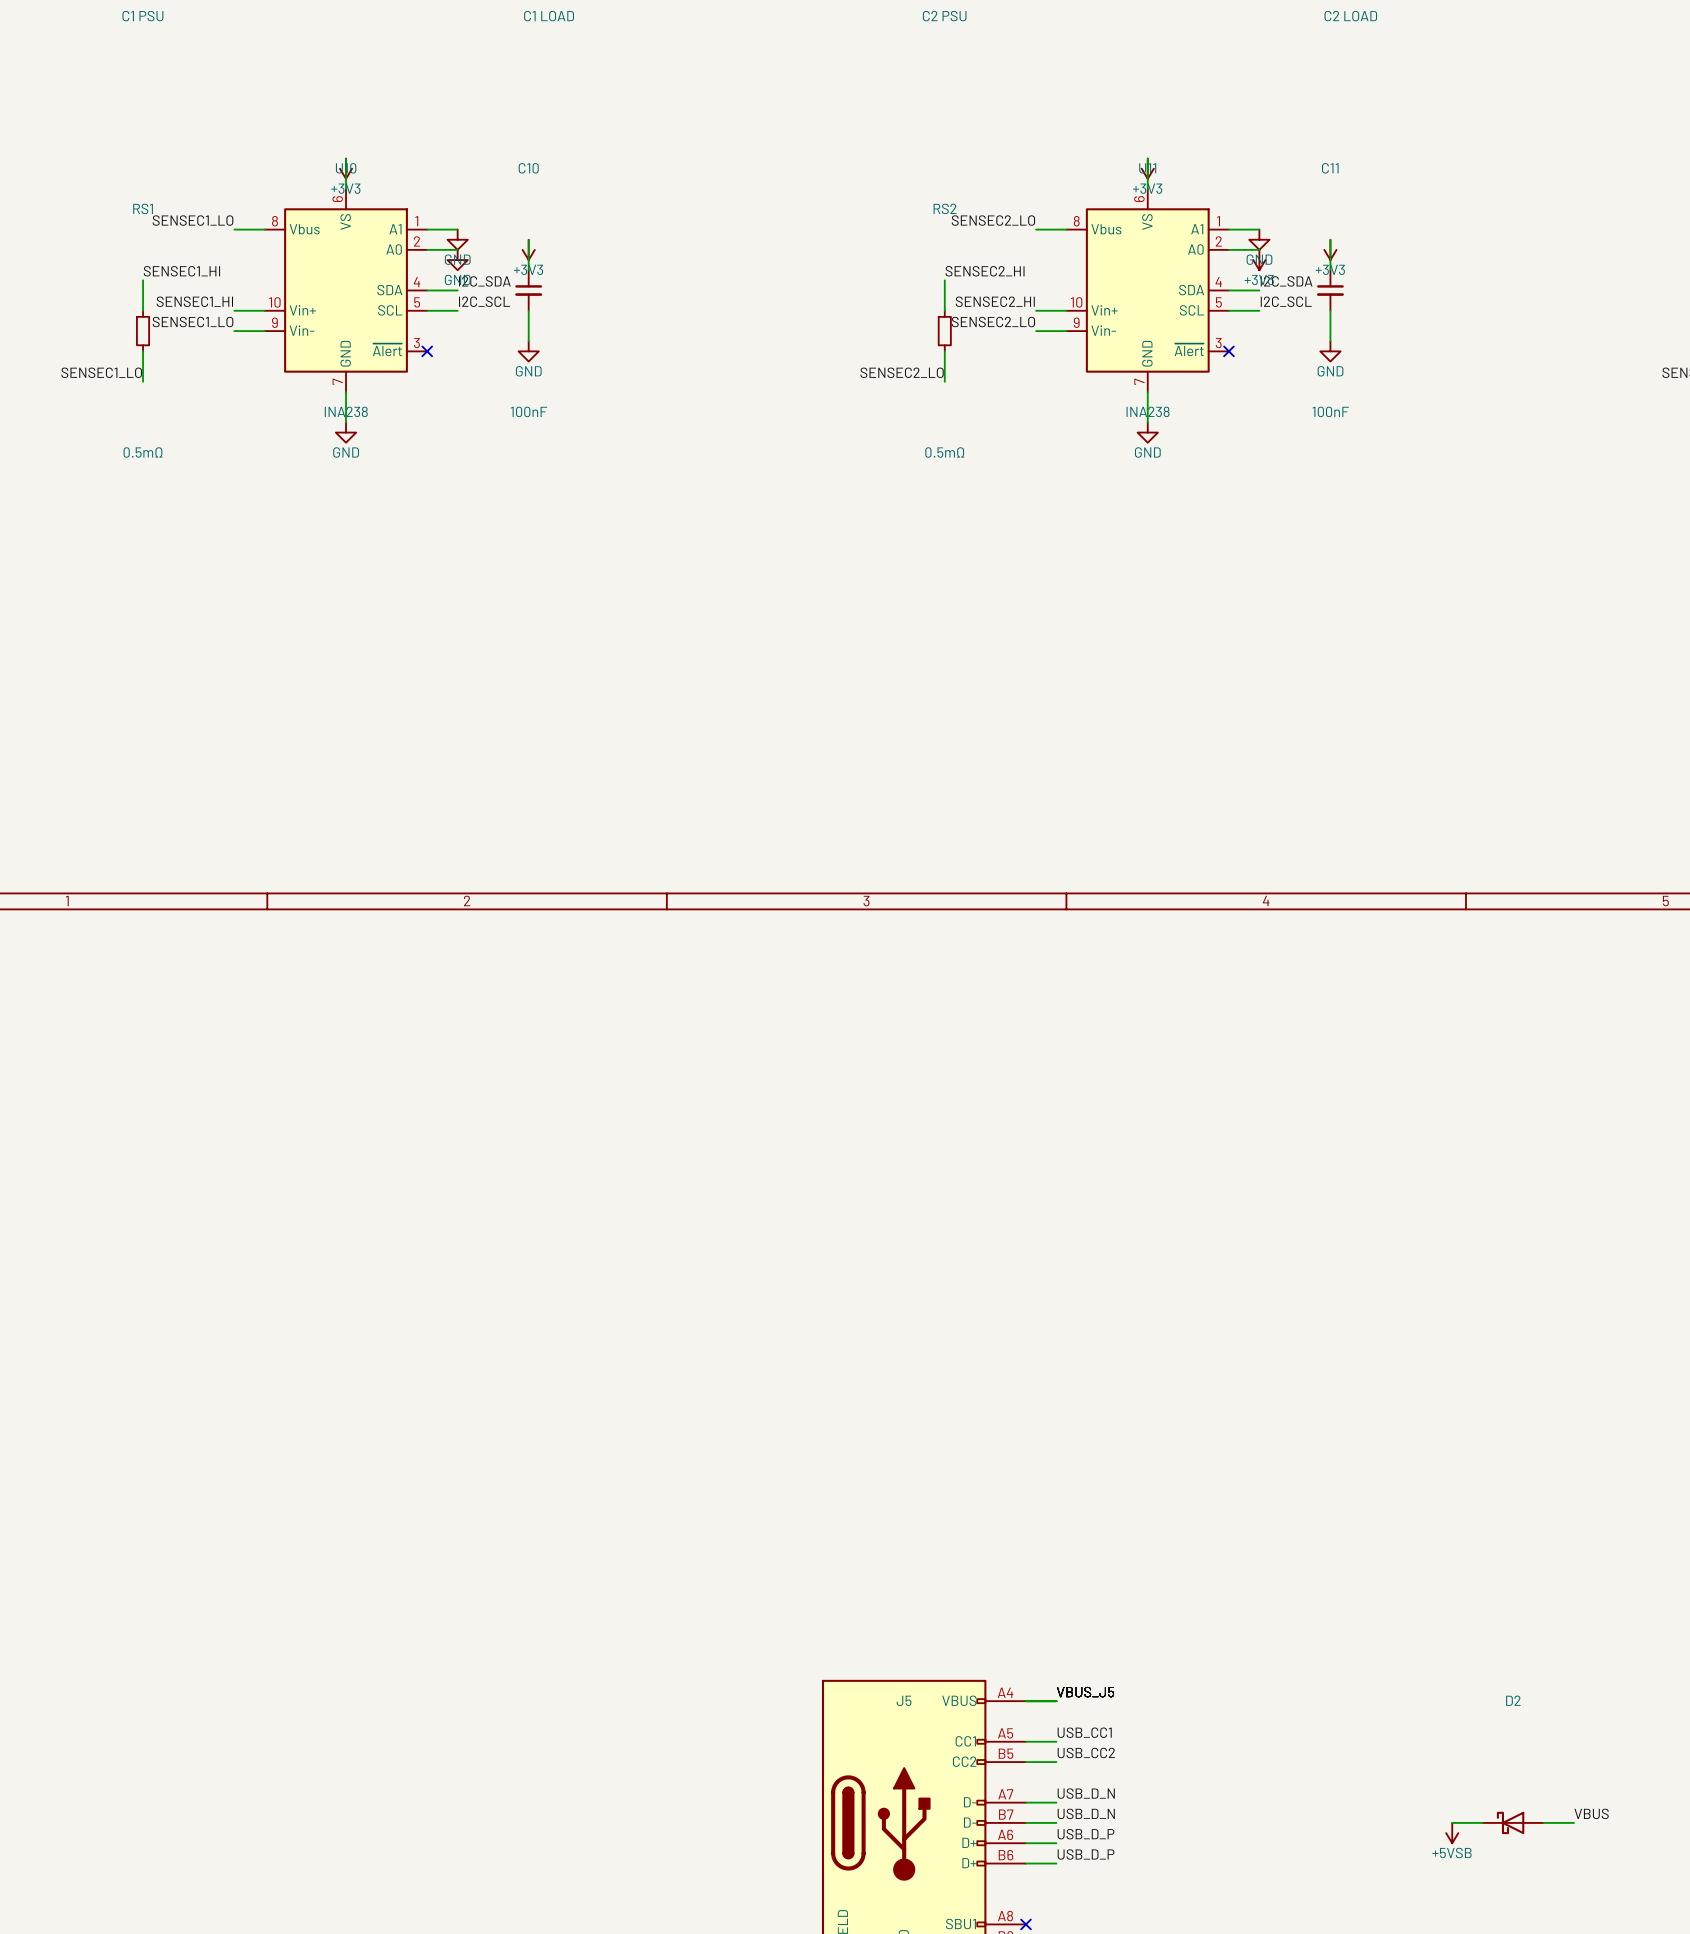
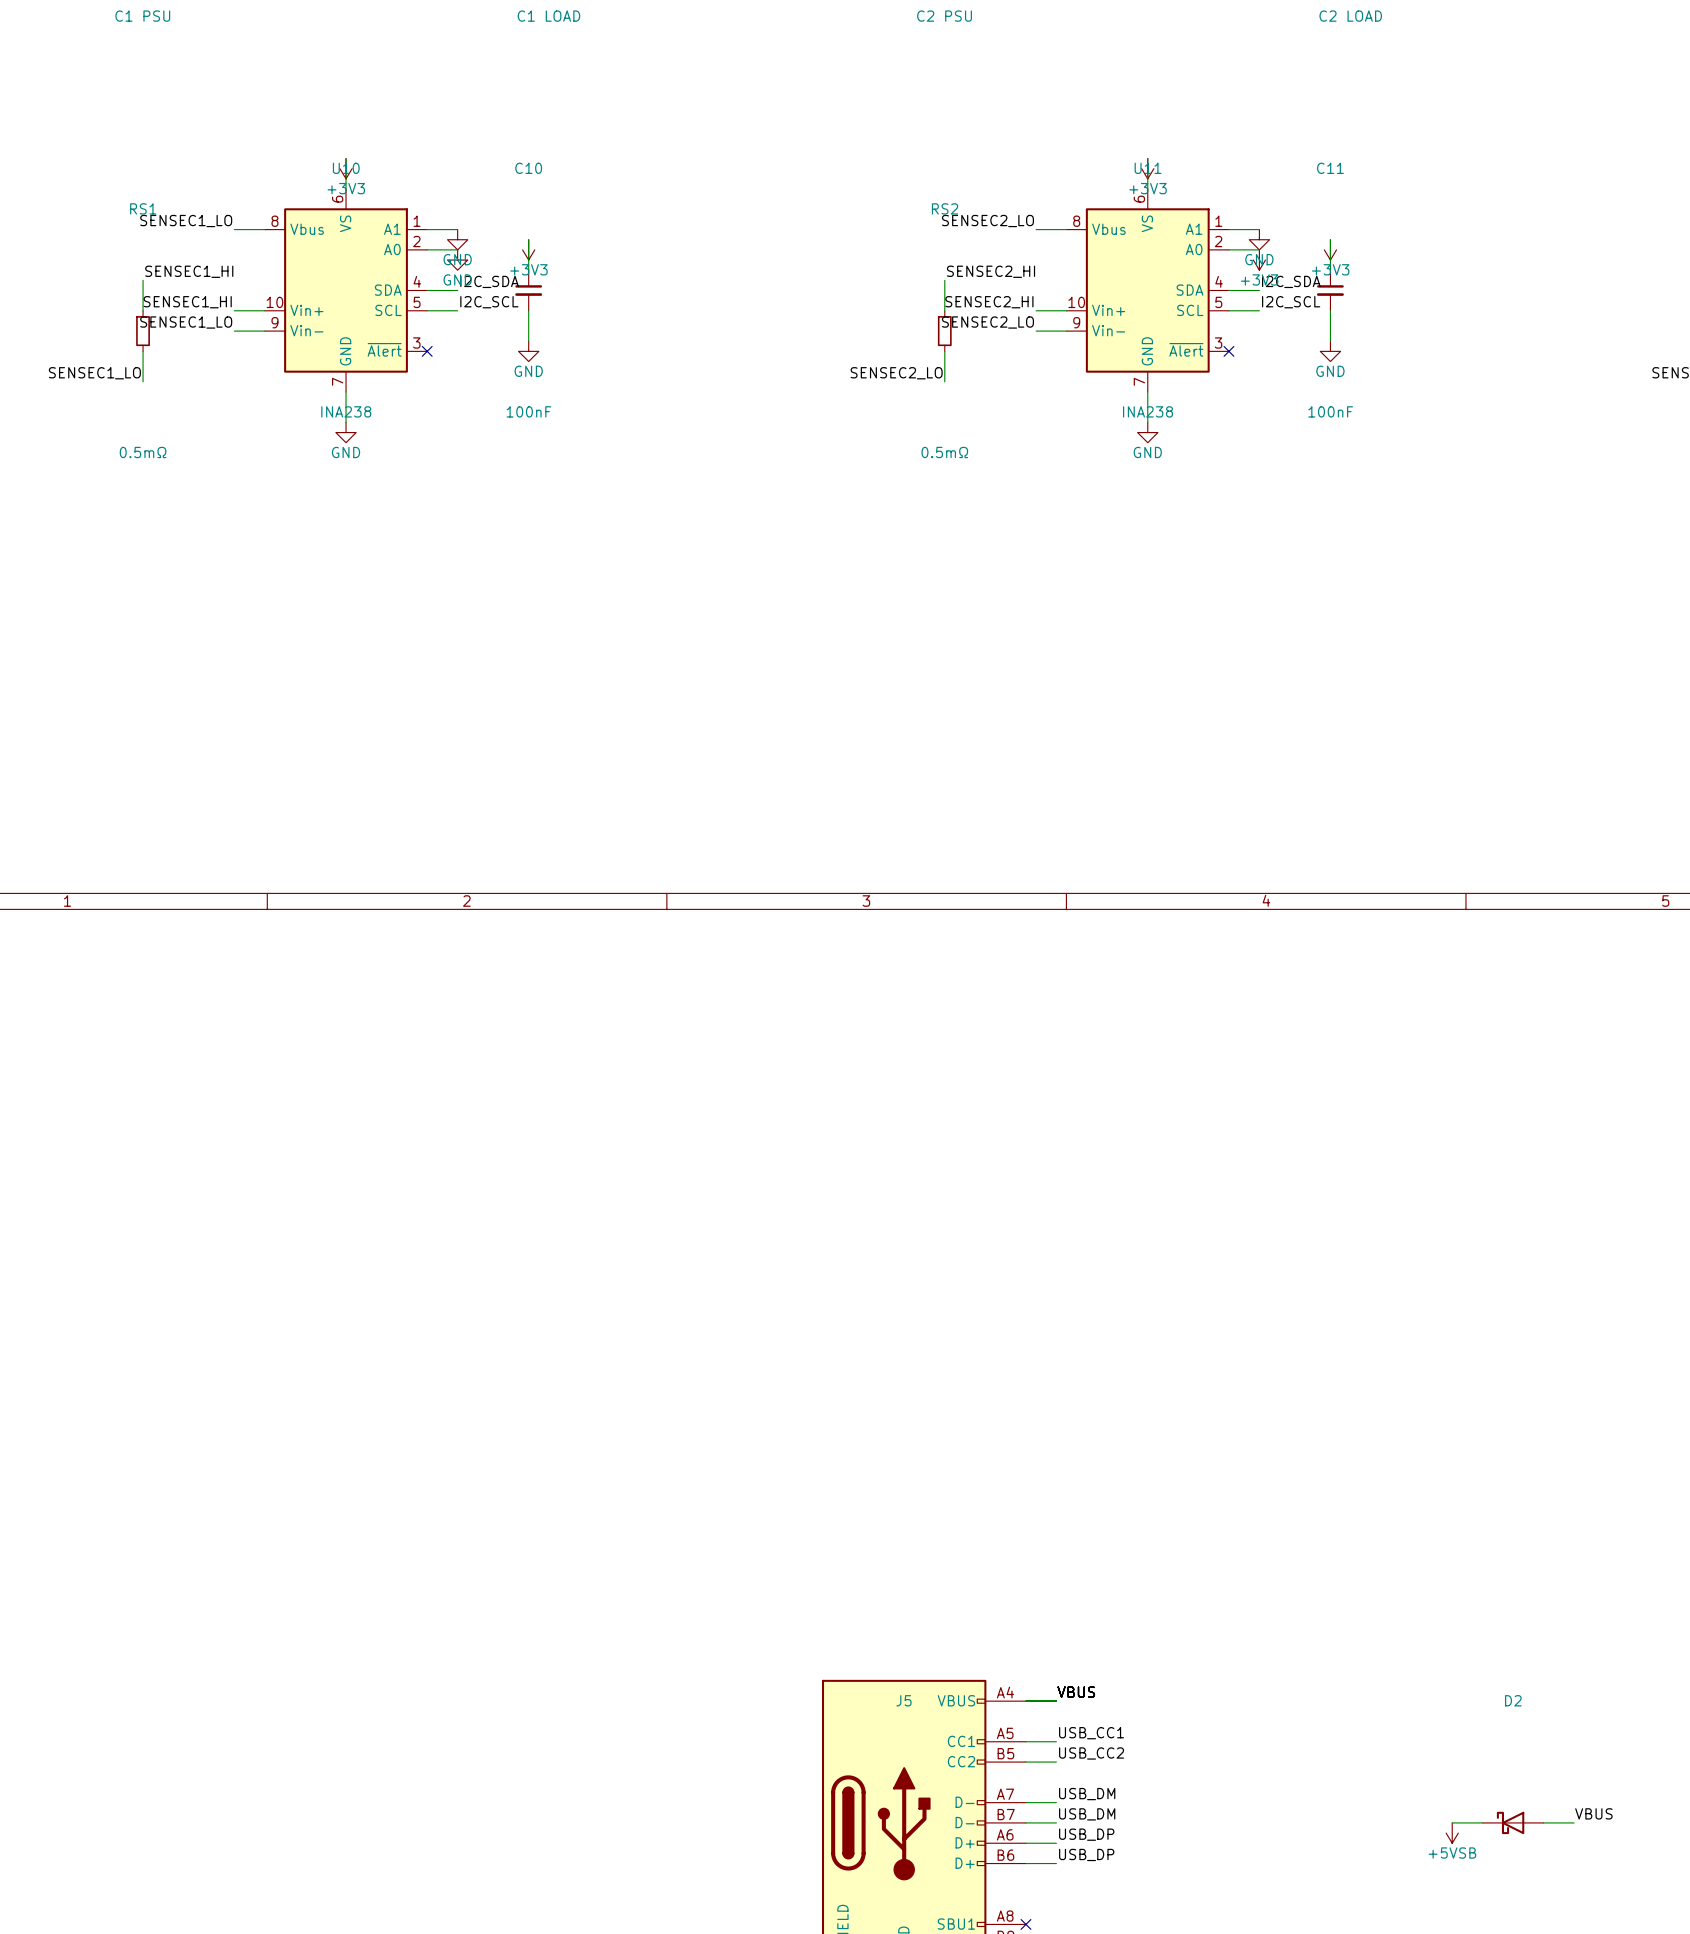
label: VBUS_J5 (1085, 1692) -> VBUS (1076, 1692)
label: USB_D_N (1086, 1793) -> USB_DM (1087, 1794)
label: USB_D_N (1086, 1813) -> USB_DM (1087, 1814)
label: USB_D_P (1086, 1834) -> USB_DP (1086, 1834)
label: USB_D_P (1086, 1854) -> USB_DP (1086, 1854)

